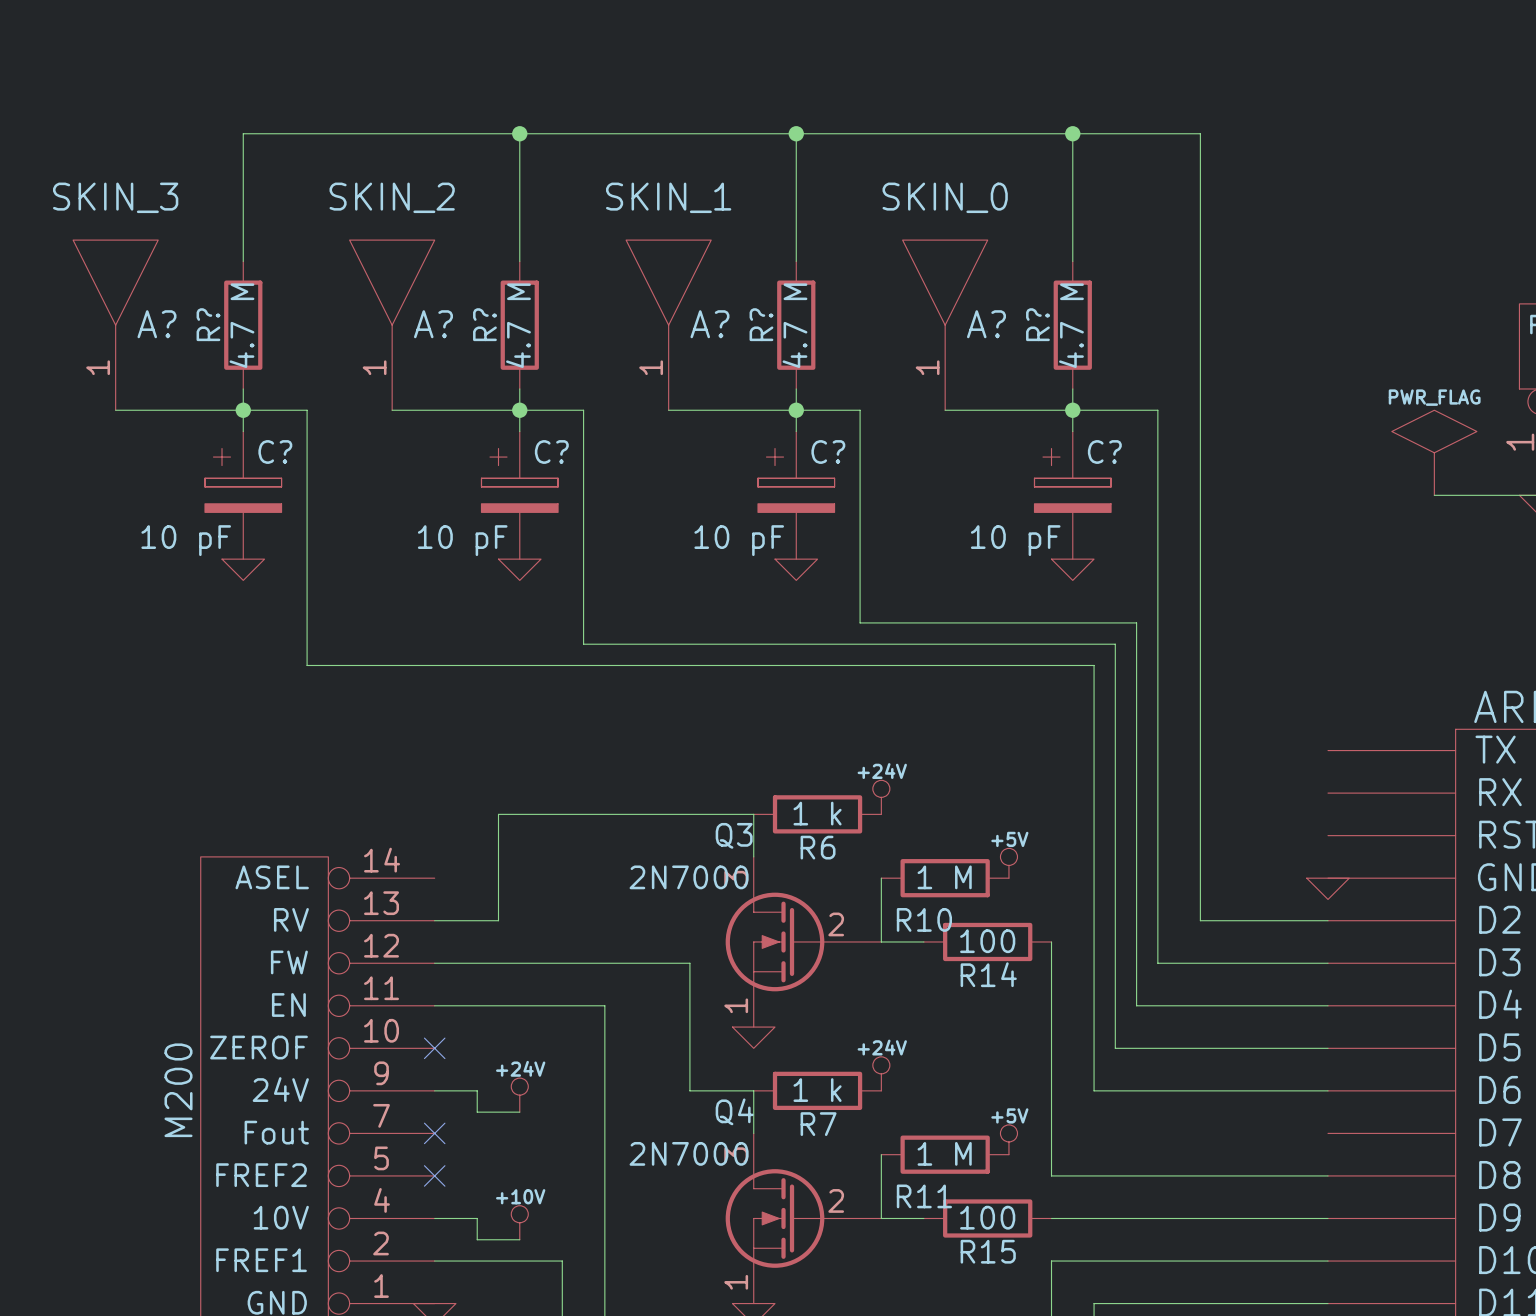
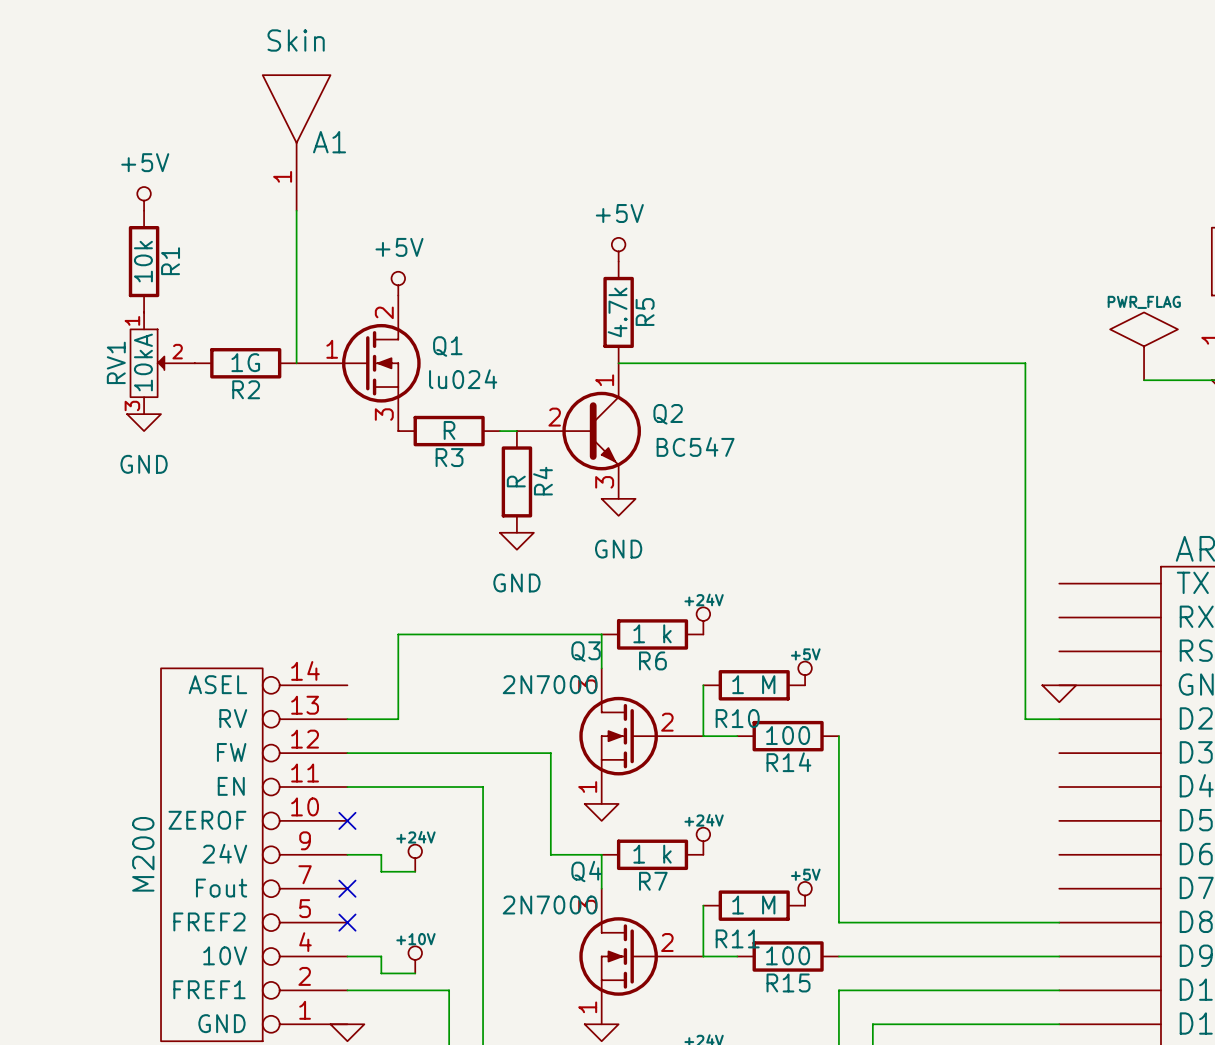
wire: (519, 133) (519, 261) -> none
junction: (519, 133) -> none
wire: (796, 133) (796, 261) -> none
junction: (796, 133) -> none
wire: (1072, 133) (1072, 261) -> none
junction: (1072, 133) -> none
A1: none -> Skin (296, 142)
wire: (243, 261) (243, 133) (1200, 133) (1200, 920) (1285, 920) -> (618, 363) (1025, 363) (1025, 719)
power symbol: none -> +5V (144, 198)
wire: none -> (296, 210) (296, 363)
A?: SKIN_3 (115, 325) -> none
R?: 4.7 M (243, 325) -> none
A?: SKIN_2 (392, 325) -> none
R?: 4.7 M (519, 325) -> none
A?: SKIN_1 (668, 325) -> none
R?: 4.7 M (796, 325) -> none
A?: SKIN_0 (945, 325) -> none
R?: 4.7 M (1072, 325) -> none
power symbol: none -> +5V (618, 249)
R1: none -> 10k (144, 261)
power symbol: none -> +5V (398, 283)
wire: (243, 388) (243, 431) -> none
wire: (519, 388) (519, 431) -> none
wire: (796, 388) (796, 431) -> none
wire: (1072, 388) (1072, 431) -> none
wire: (115, 410) (307, 410) (307, 665) (1094, 665) (1094, 1090) (1328, 1090) -> none
junction: (243, 410) -> none
wire: (392, 410) (583, 410) (583, 644) (1115, 644) (1115, 1048) (1328, 1048) -> none
junction: (519, 410) -> none
wire: (668, 410) (860, 410) (860, 622) (1136, 622) (1136, 1005) (1328, 1005) -> none
R5: none -> 4.7k (618, 312)
junction: (796, 410) -> none
wire: (945, 410) (1157, 410) (1157, 963) (1328, 963) -> none
junction: (1072, 410) -> none
RV1: none -> 10kA (162, 363)
R2: none -> 1G (245, 363)
Q1: none -> lu024 (358, 363)
C?: 10 pF (243, 495) -> none
C?: 10 pF (519, 495) -> none
C?: 10 pF (796, 495) -> none
C?: 10 pF (1072, 495) -> none
power symbol: none -> GND (144, 422)
R3: none -> R (449, 431)
wire: none -> (499, 431) (516, 431)
Q2: none -> BC547 (578, 431)
power symbol: (243, 569) -> none
power symbol: (519, 569) -> none
power symbol: (796, 569) -> none
power symbol: (1072, 569) -> none
R4: none -> R (516, 481)
power symbol: none -> GND (618, 507)
power symbol: none -> GND (516, 541)

